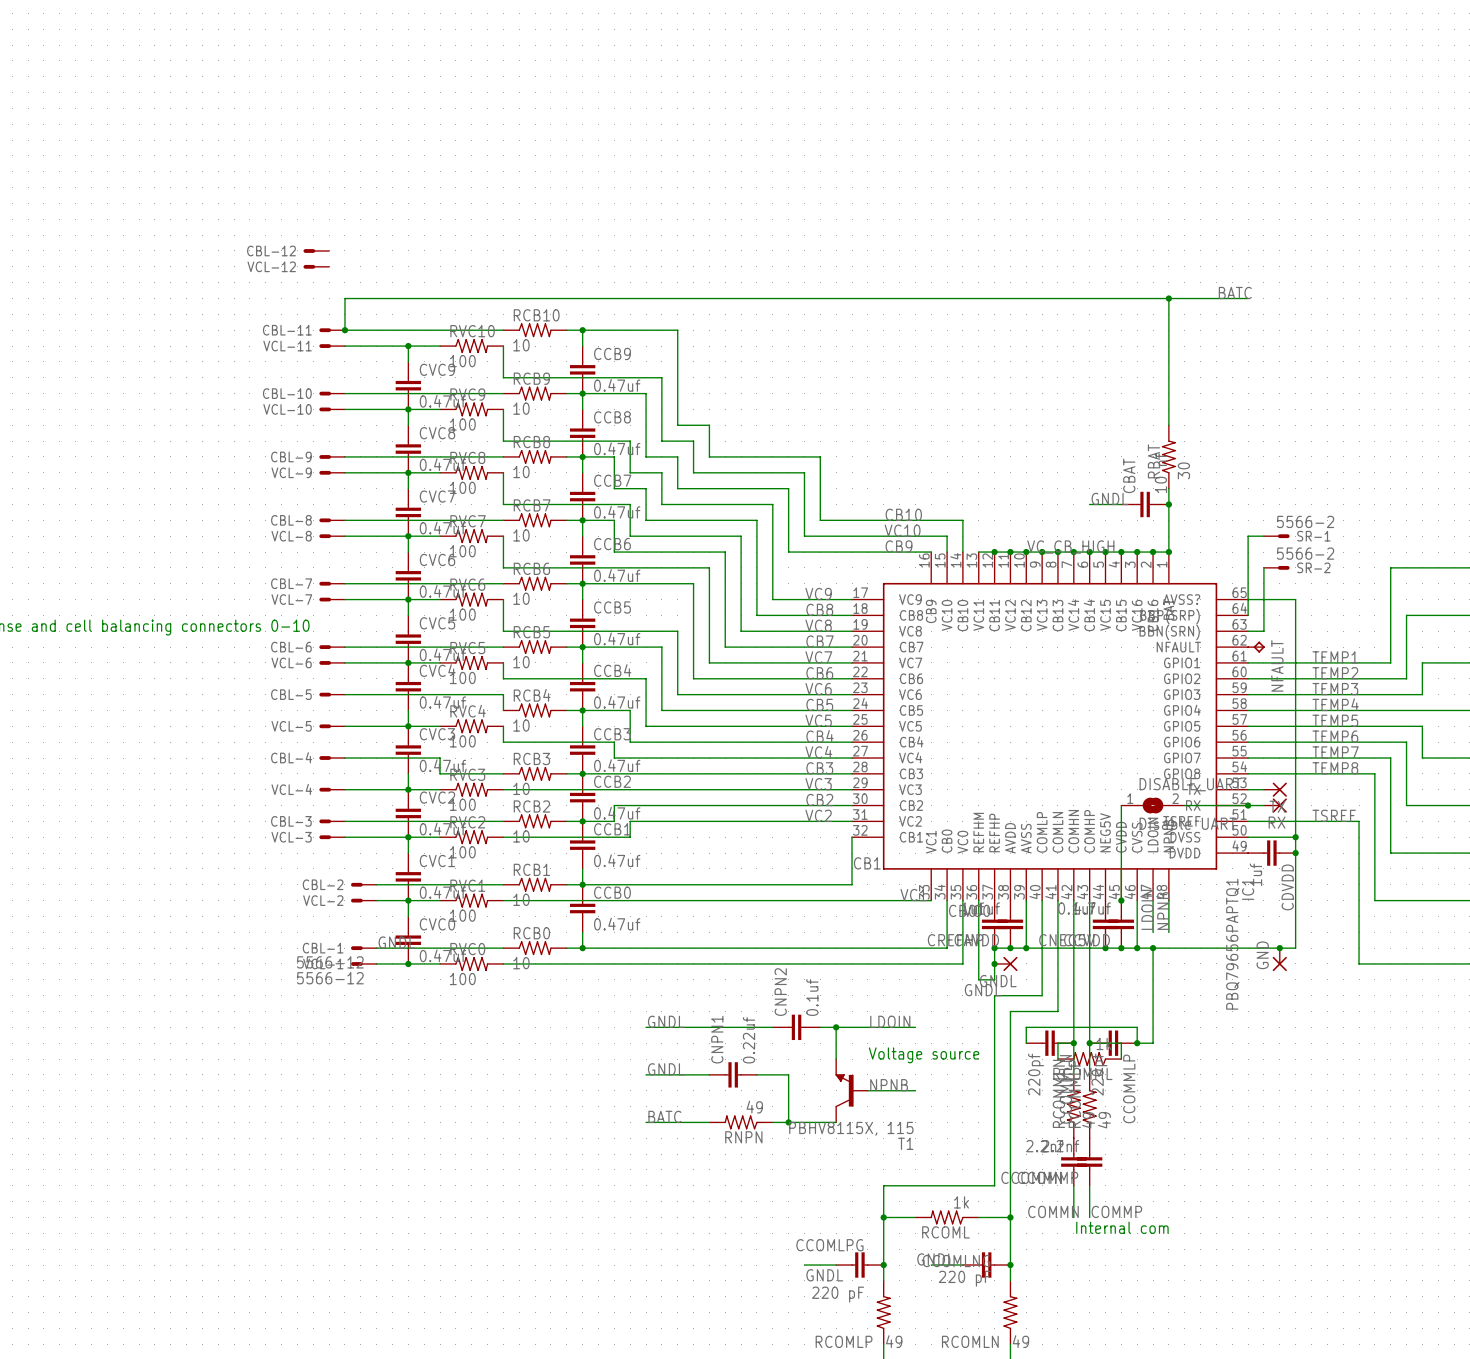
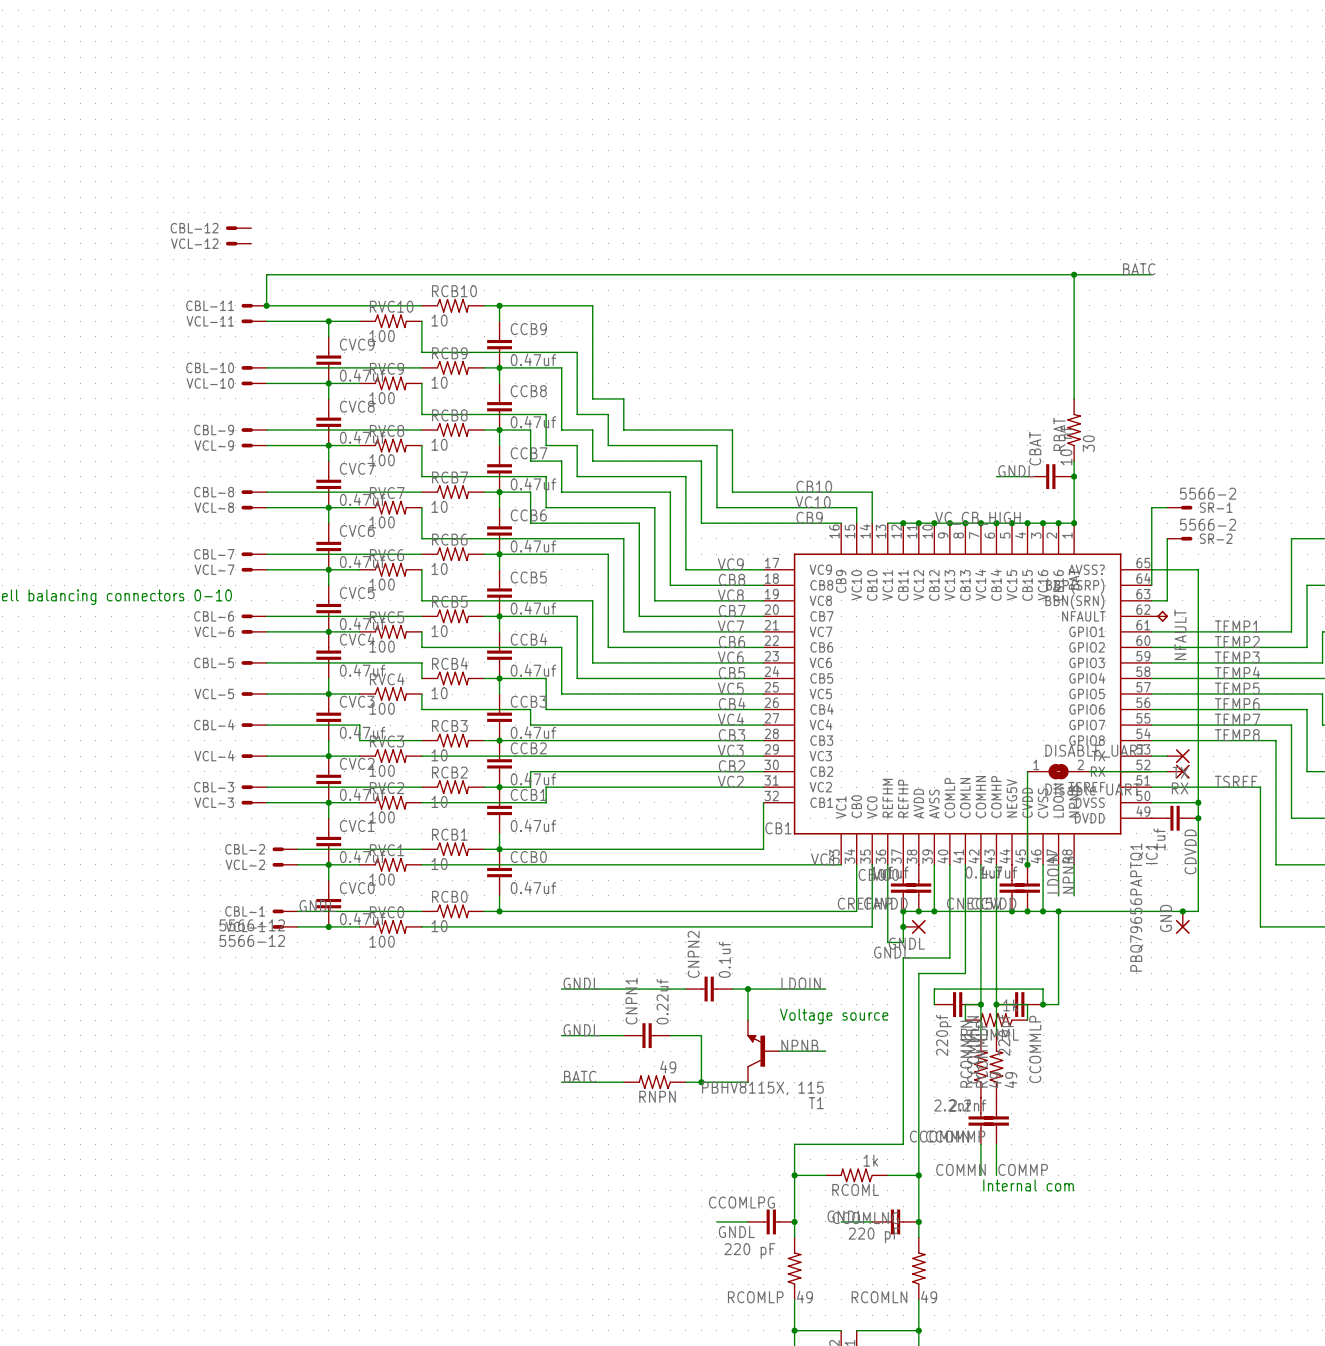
junction: (1248, 805) -> none

